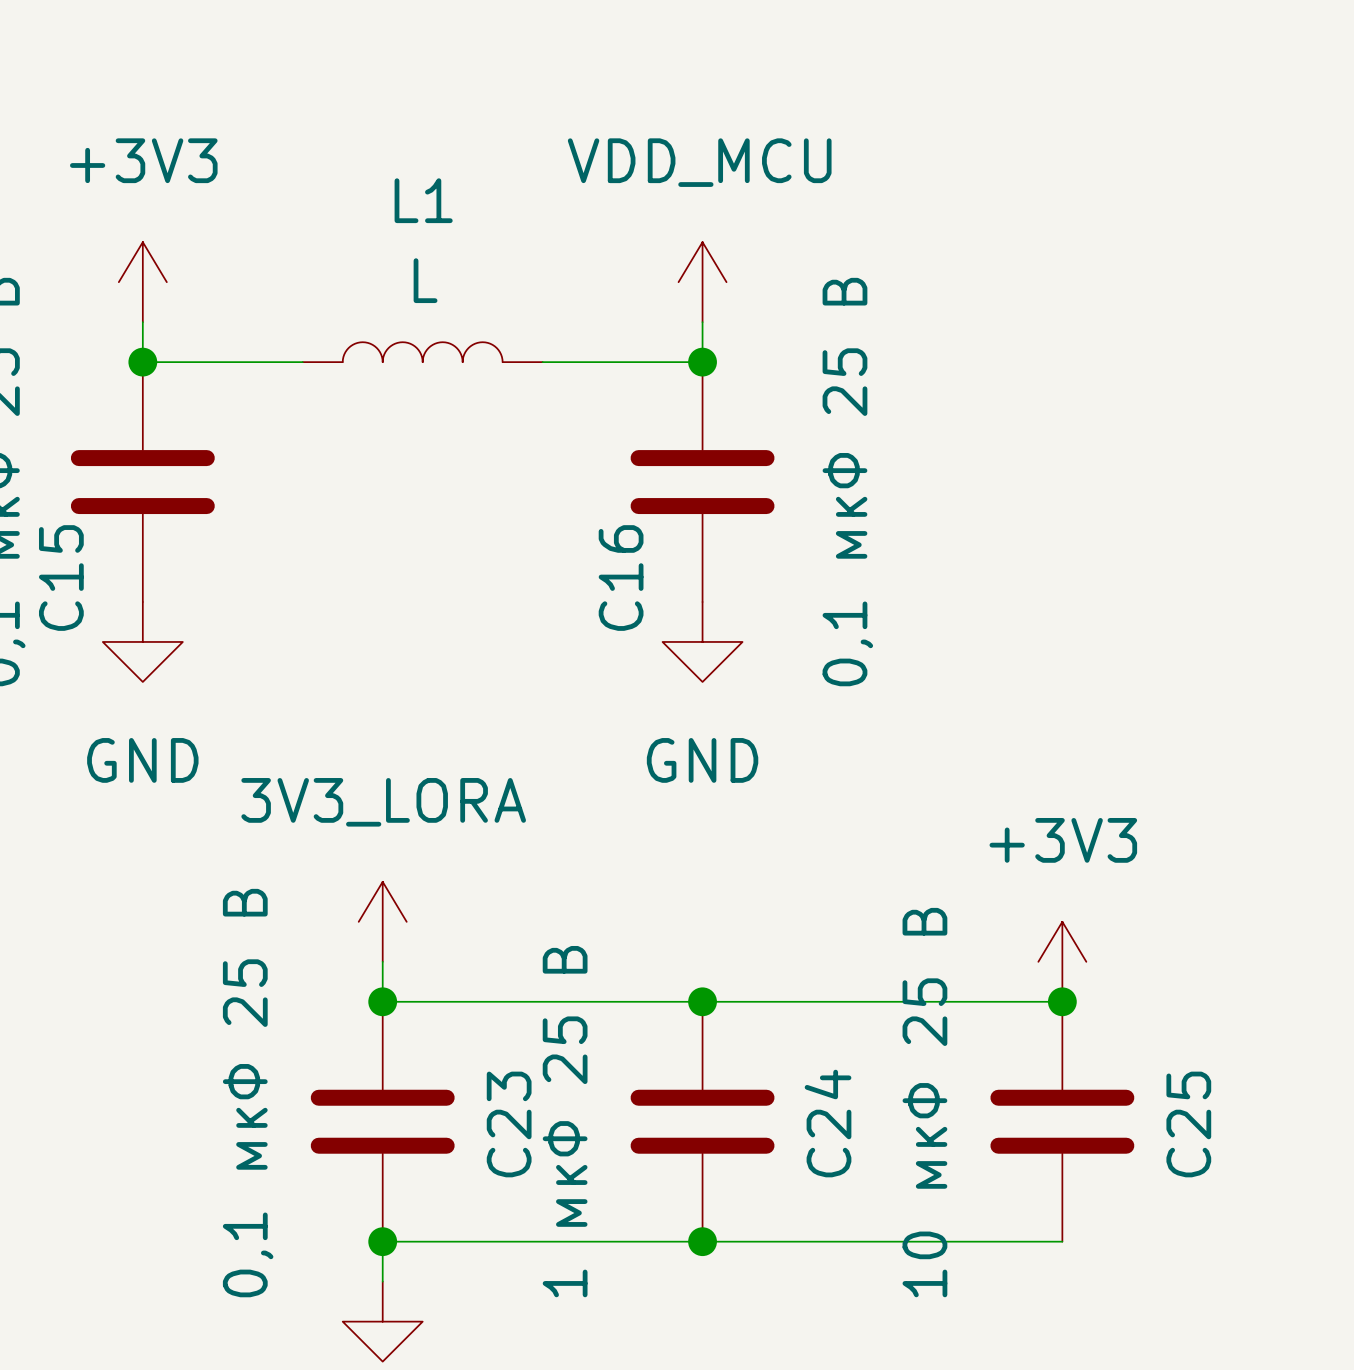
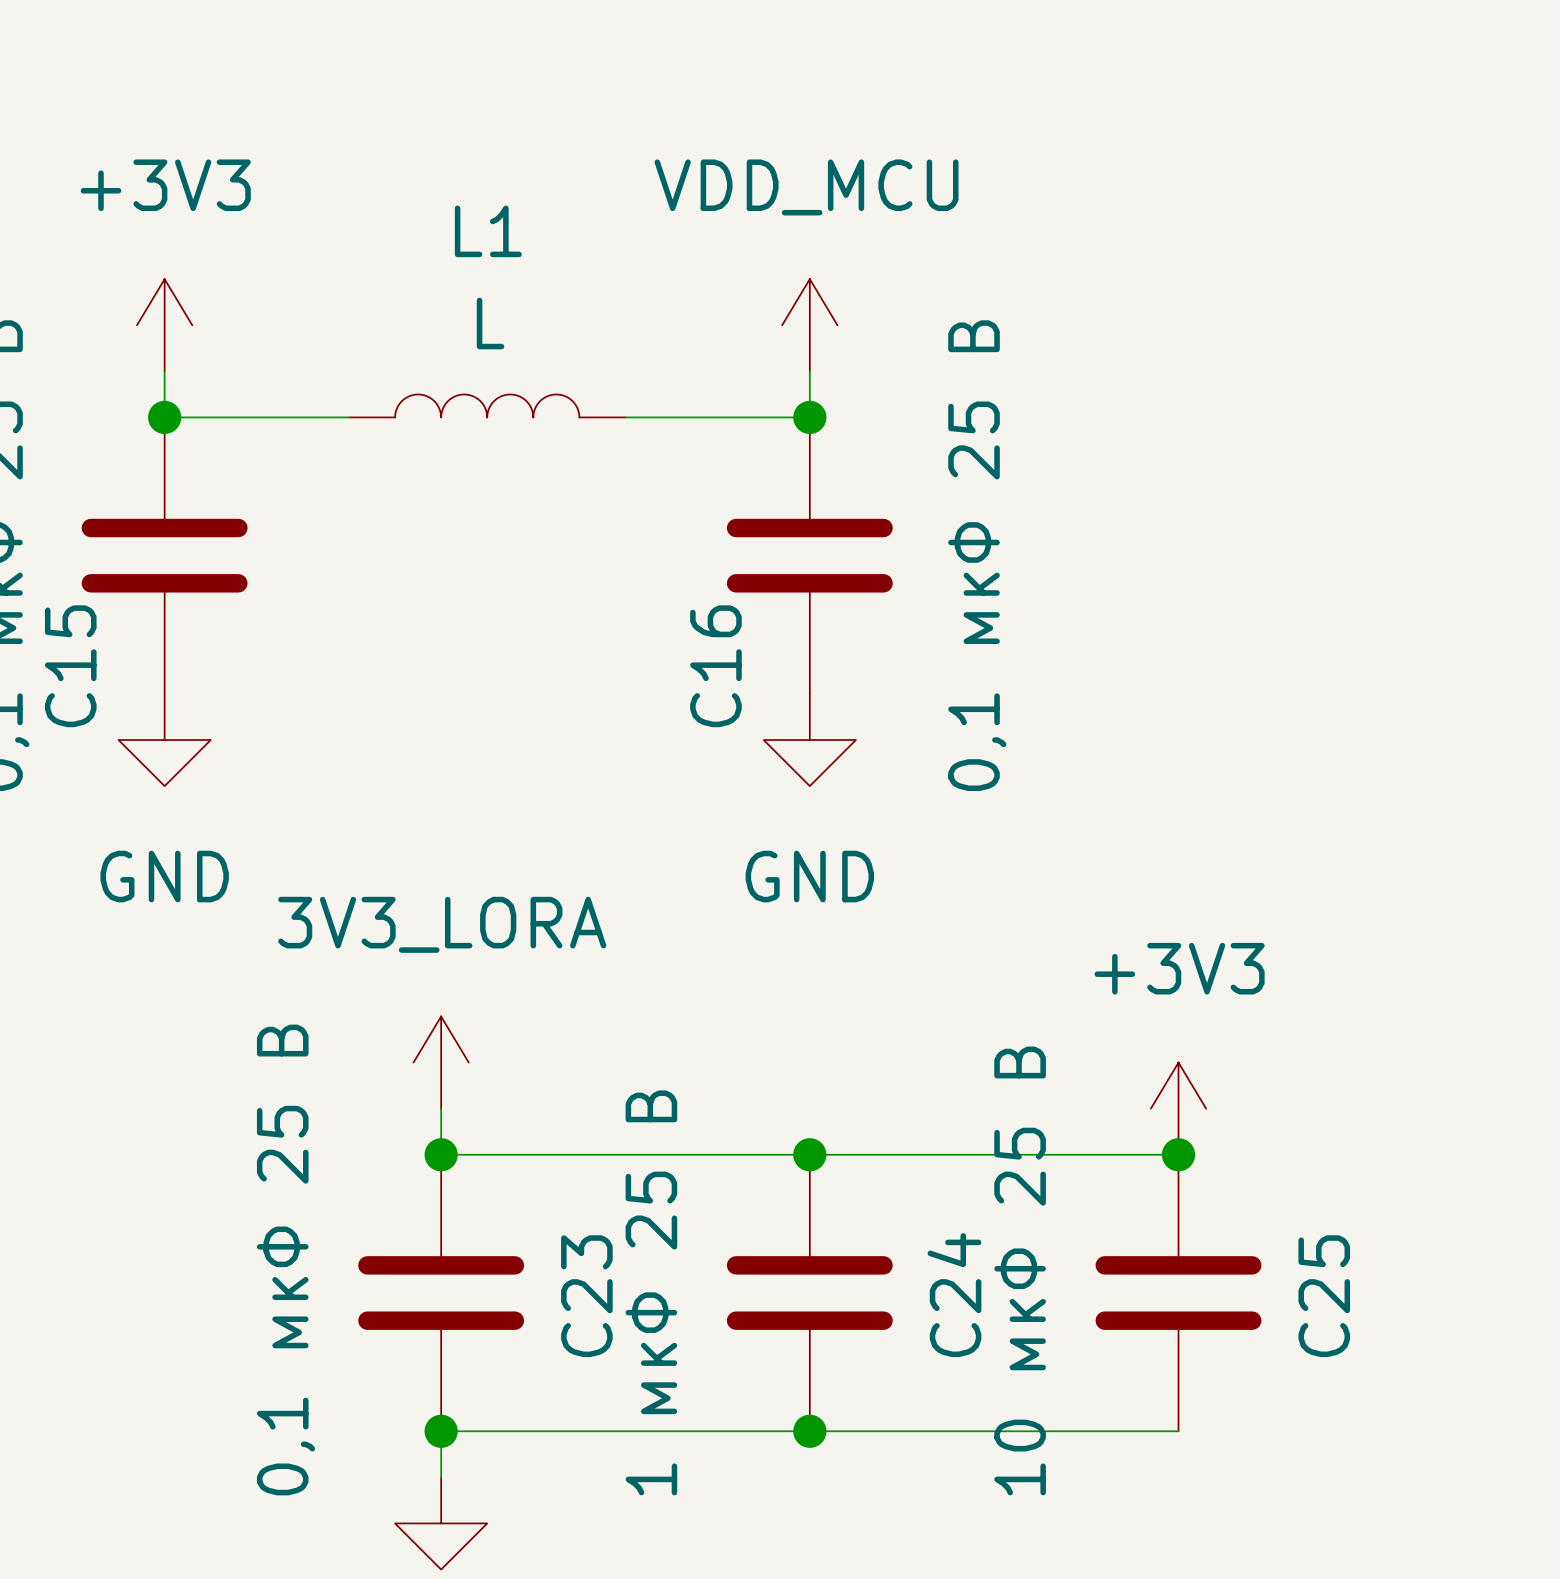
power symbol position: +3V3 (1062, 961) -> +3V3 (1178, 1108)
wire: (1022, 1001) (1062, 1001) -> none
junction position: (1062, 1001) -> (1178, 1154)
C25 position: (1062, 1121) -> (1178, 1293)
wire: (1022, 1241) (1062, 1241) -> none

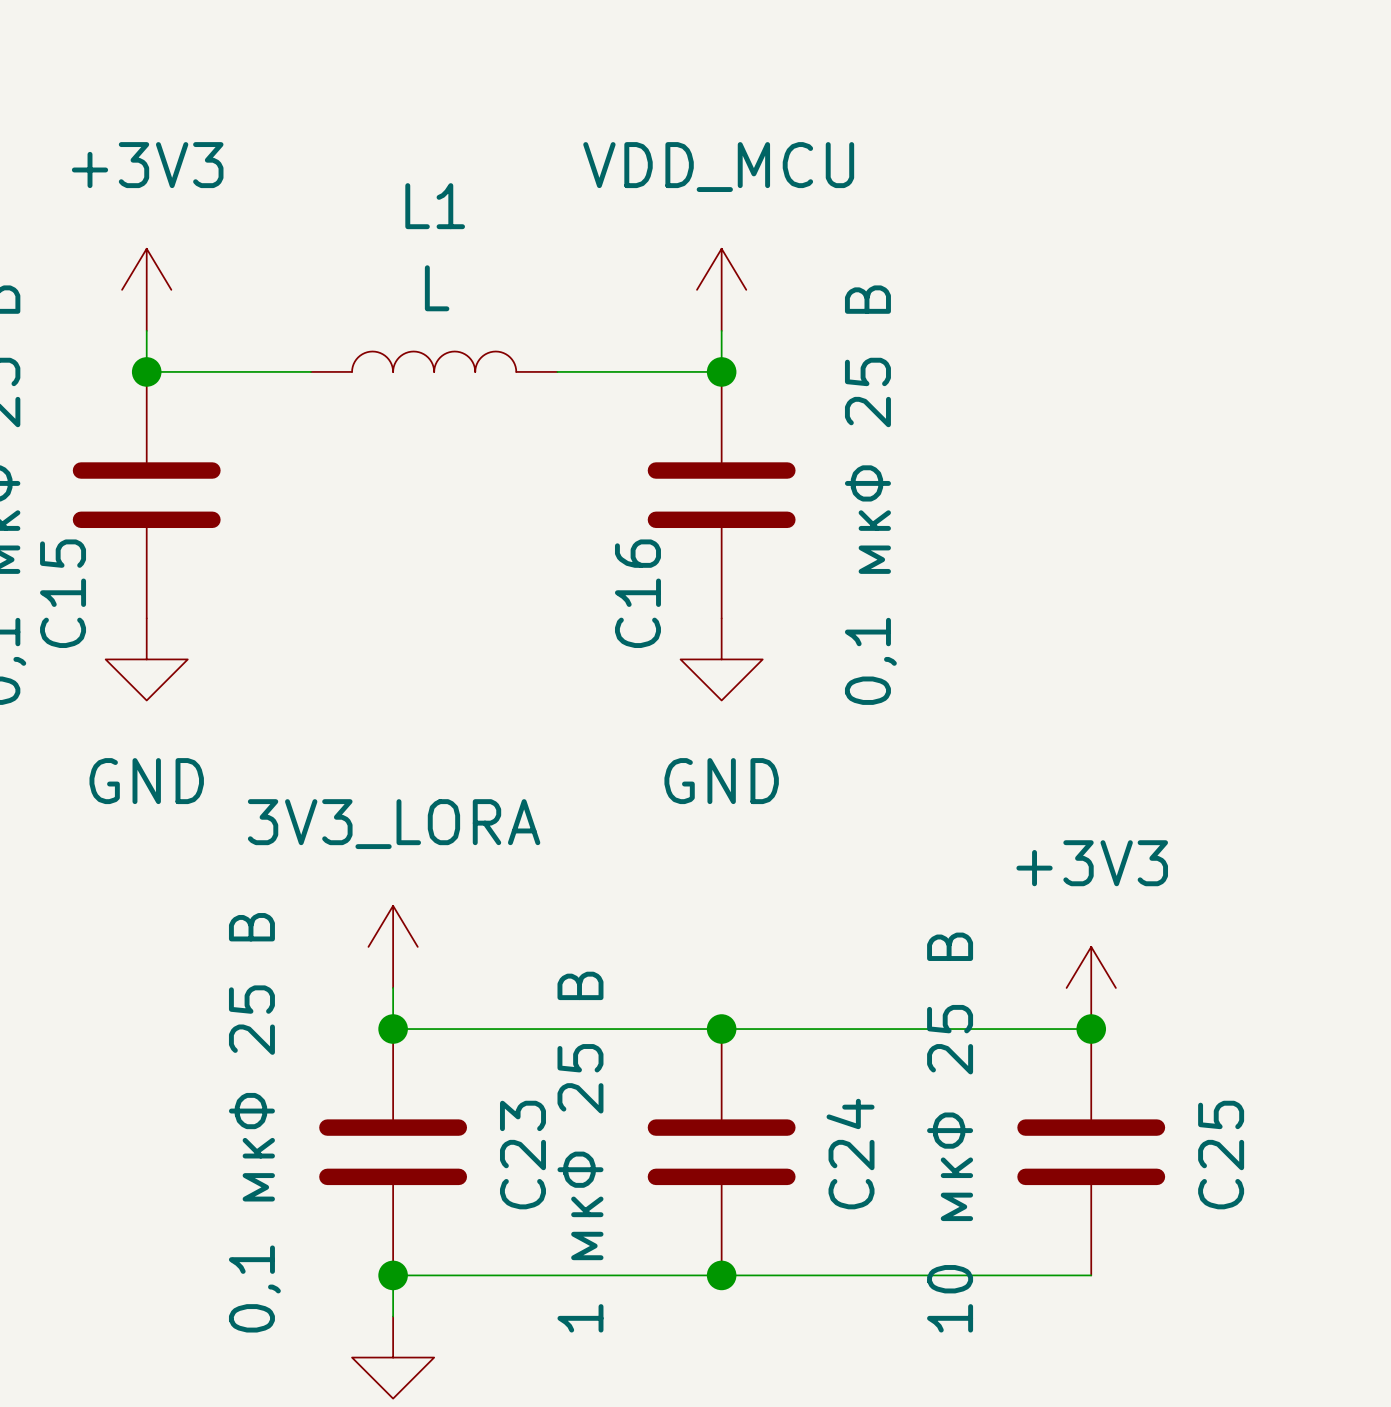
power symbol position: +3V3 (1178, 1108) -> +3V3 (1091, 987)
wire: none -> (1050, 1029) (1091, 1029)
junction position: (1178, 1154) -> (1091, 1029)
C25 position: (1178, 1293) -> (1091, 1152)
wire: none -> (1050, 1275) (1091, 1275)

